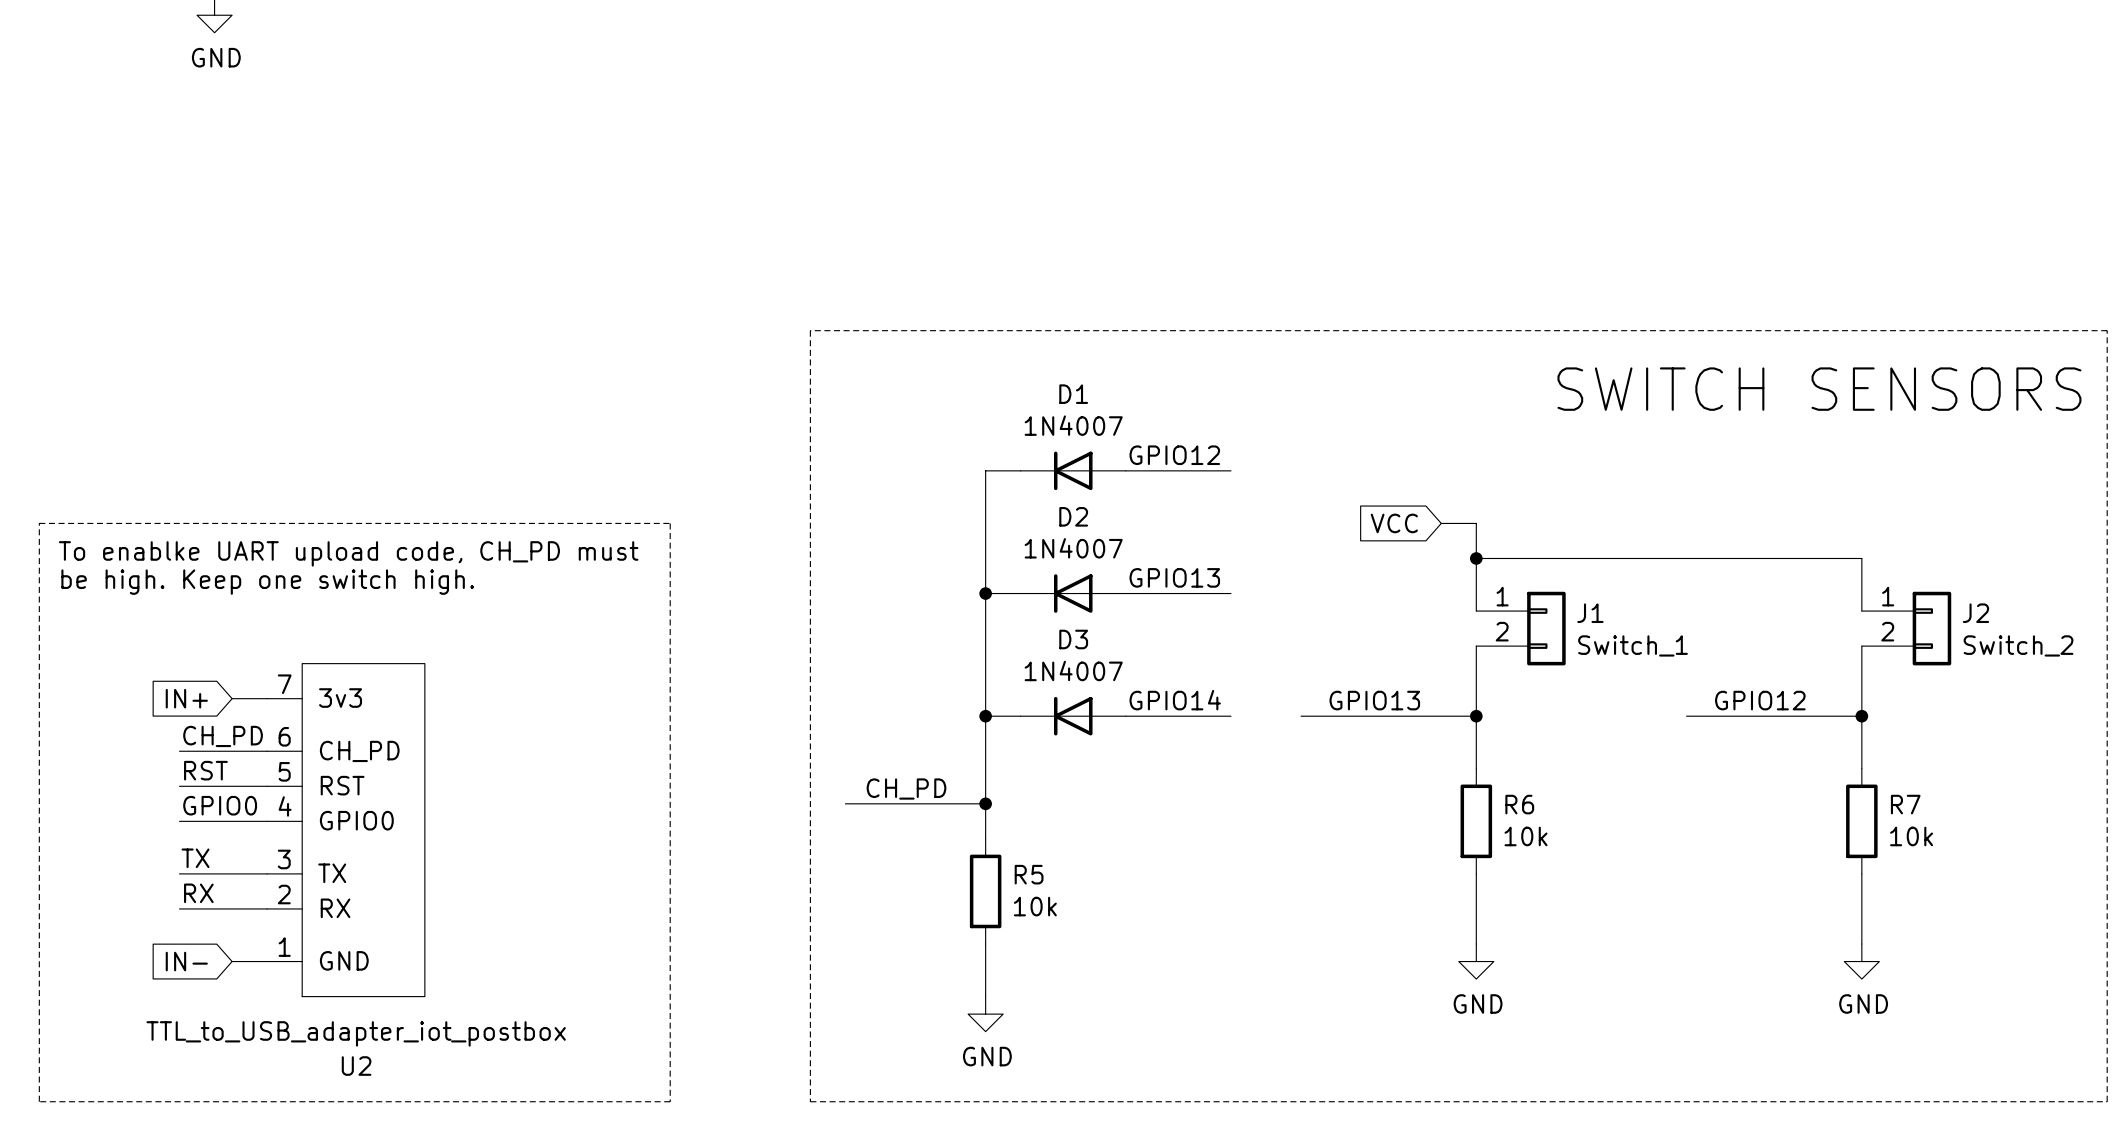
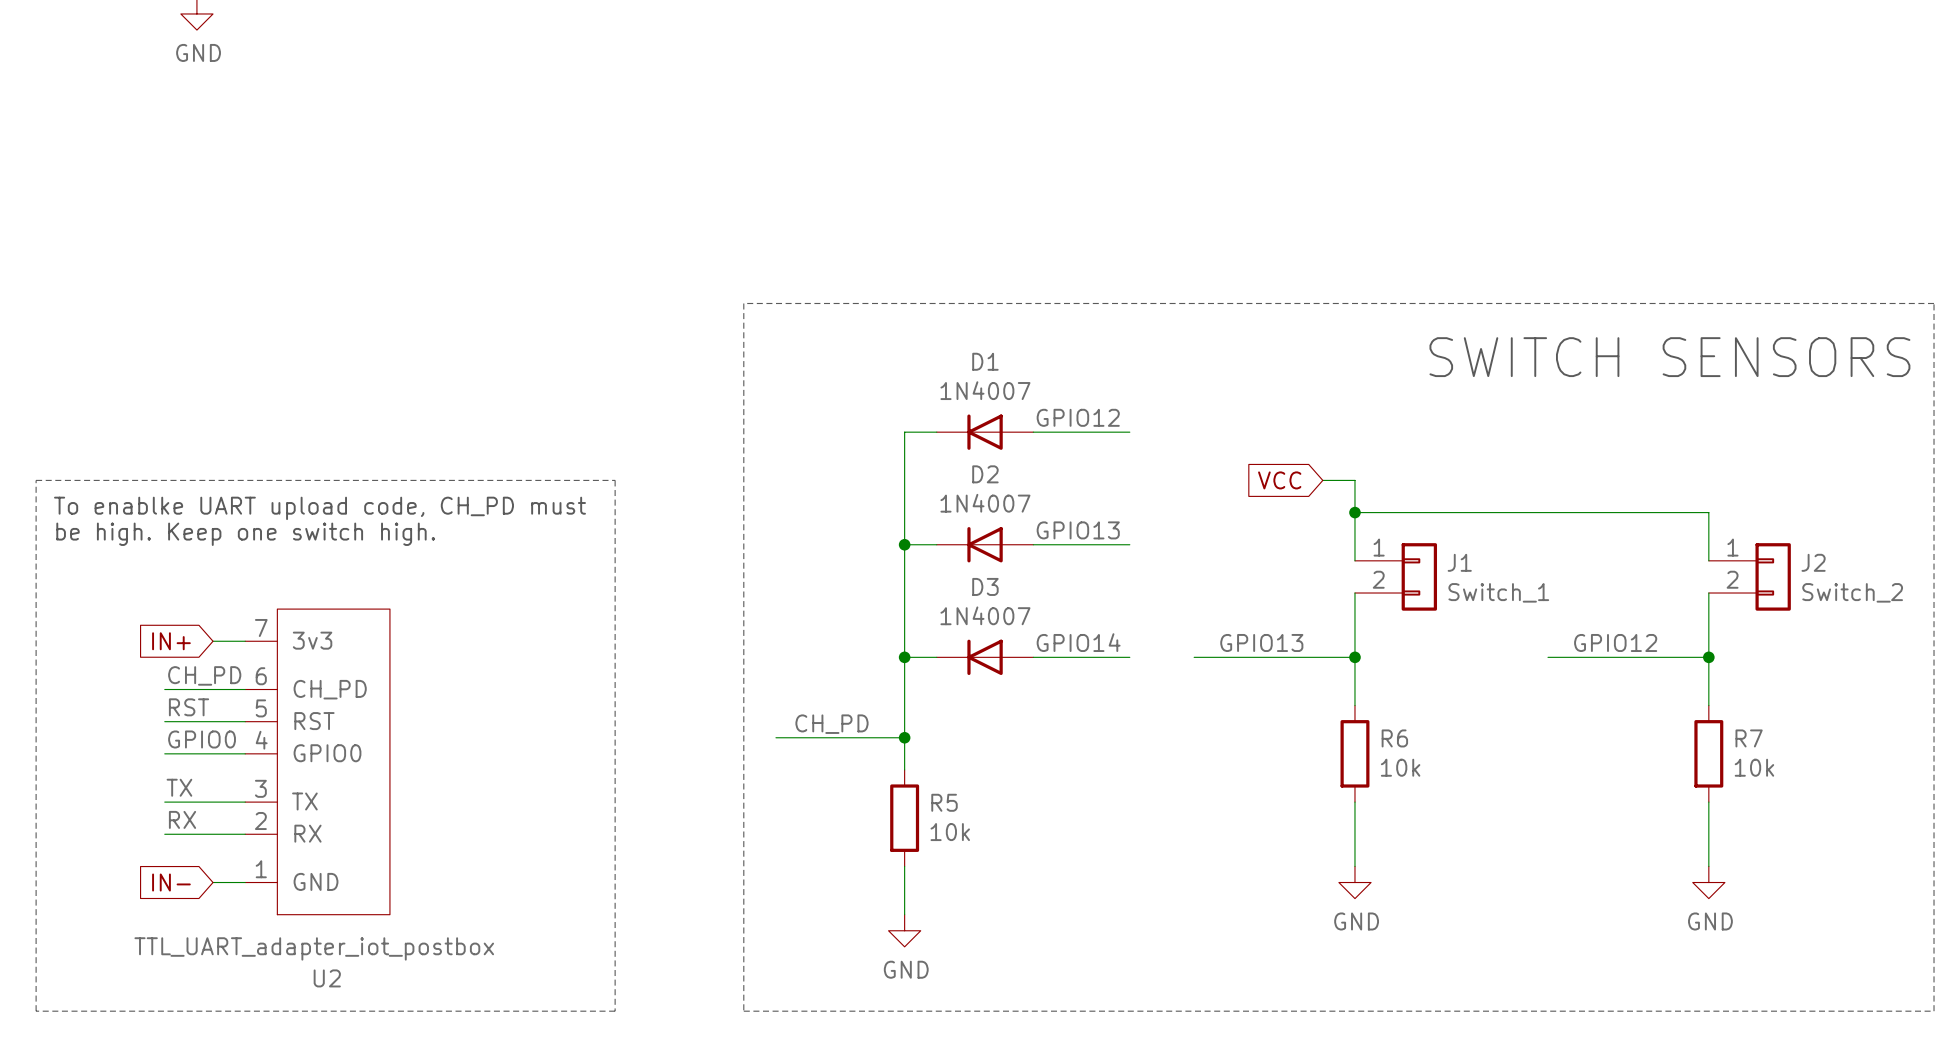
U2 value: TTL_to_USB_adapter_iot_postbox (356, 1033) -> TTL_UART_adapter_iot_postbox (314, 948)

